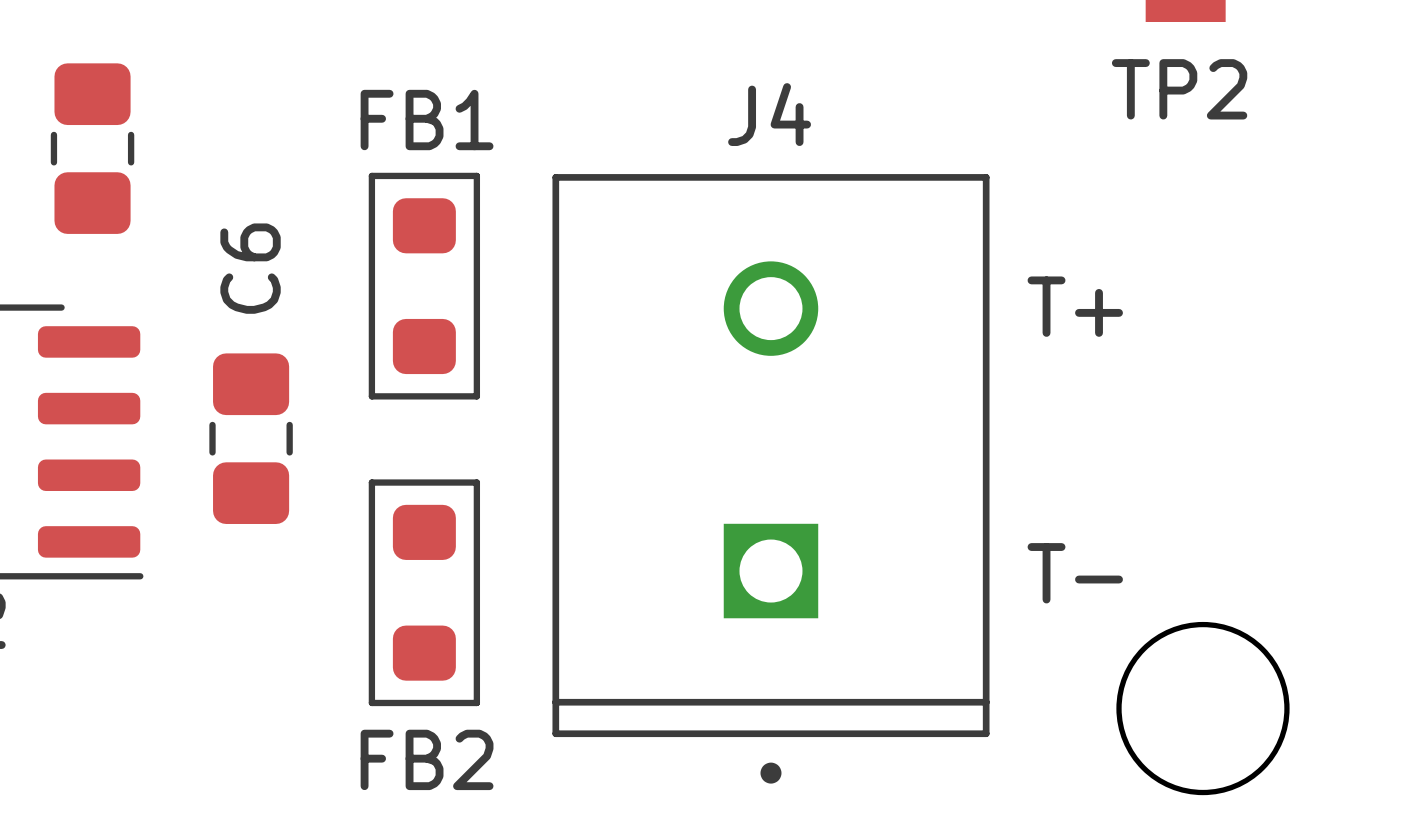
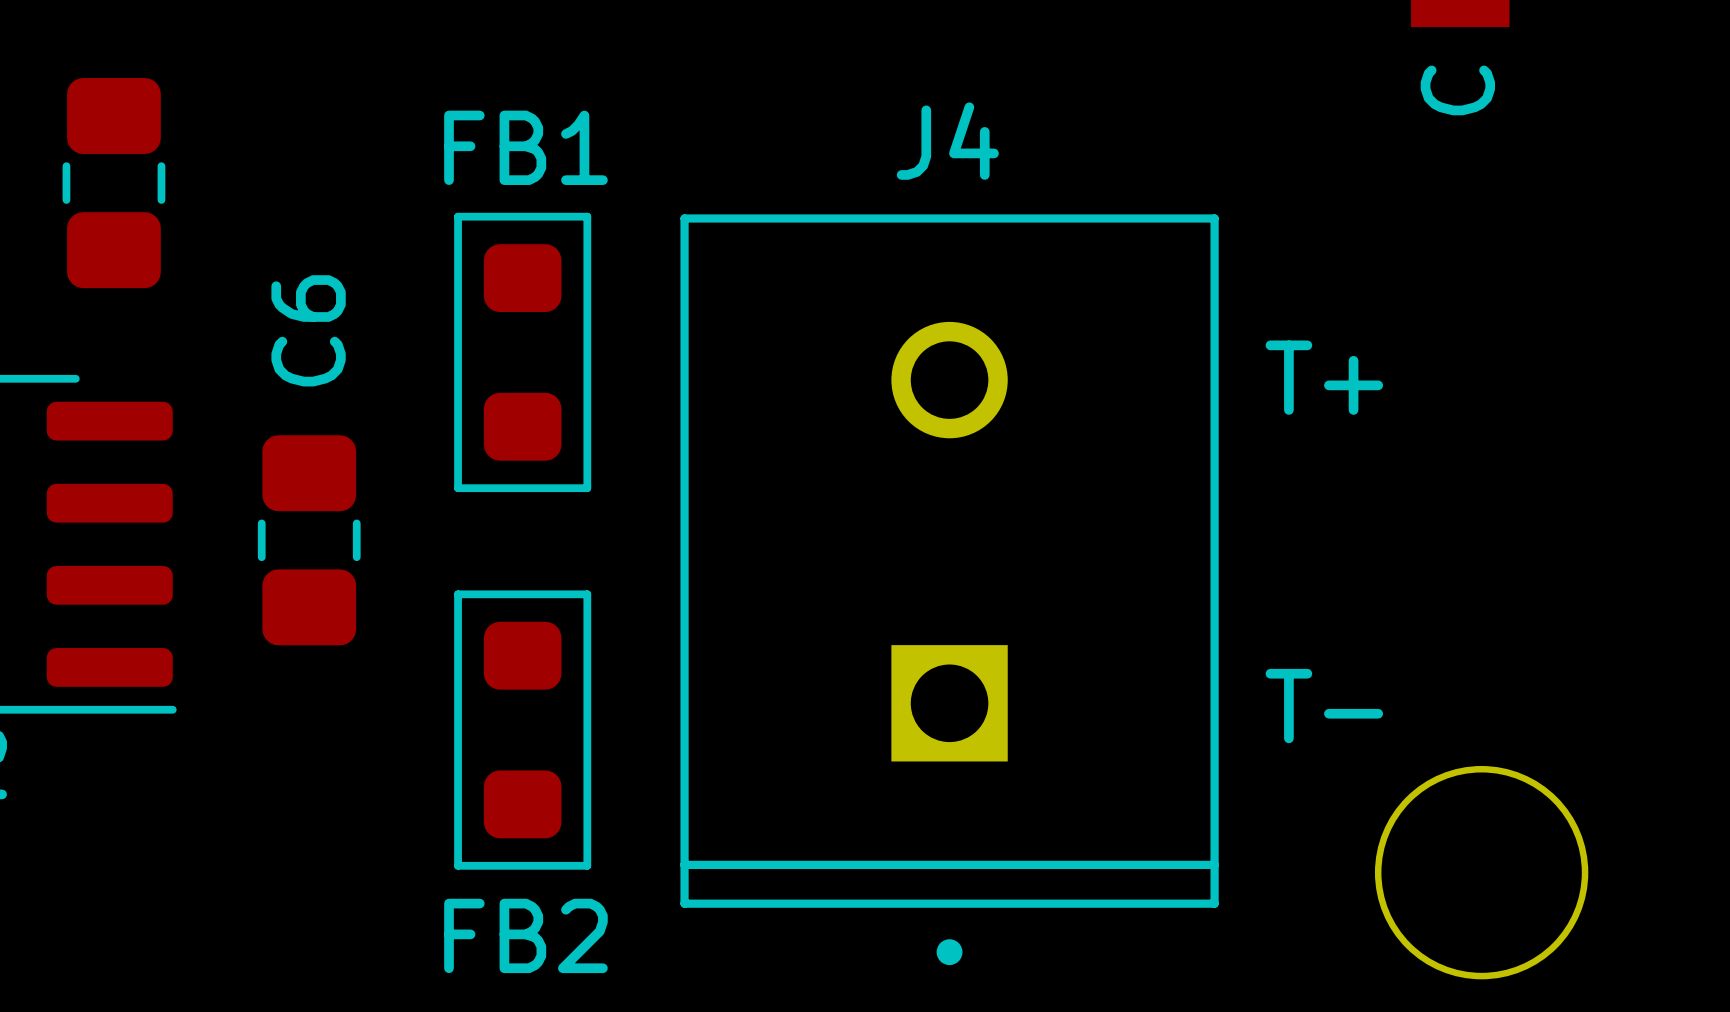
text: none -> C (1457, 90)
TP2 name: TP2 (1179, 89) -> none

